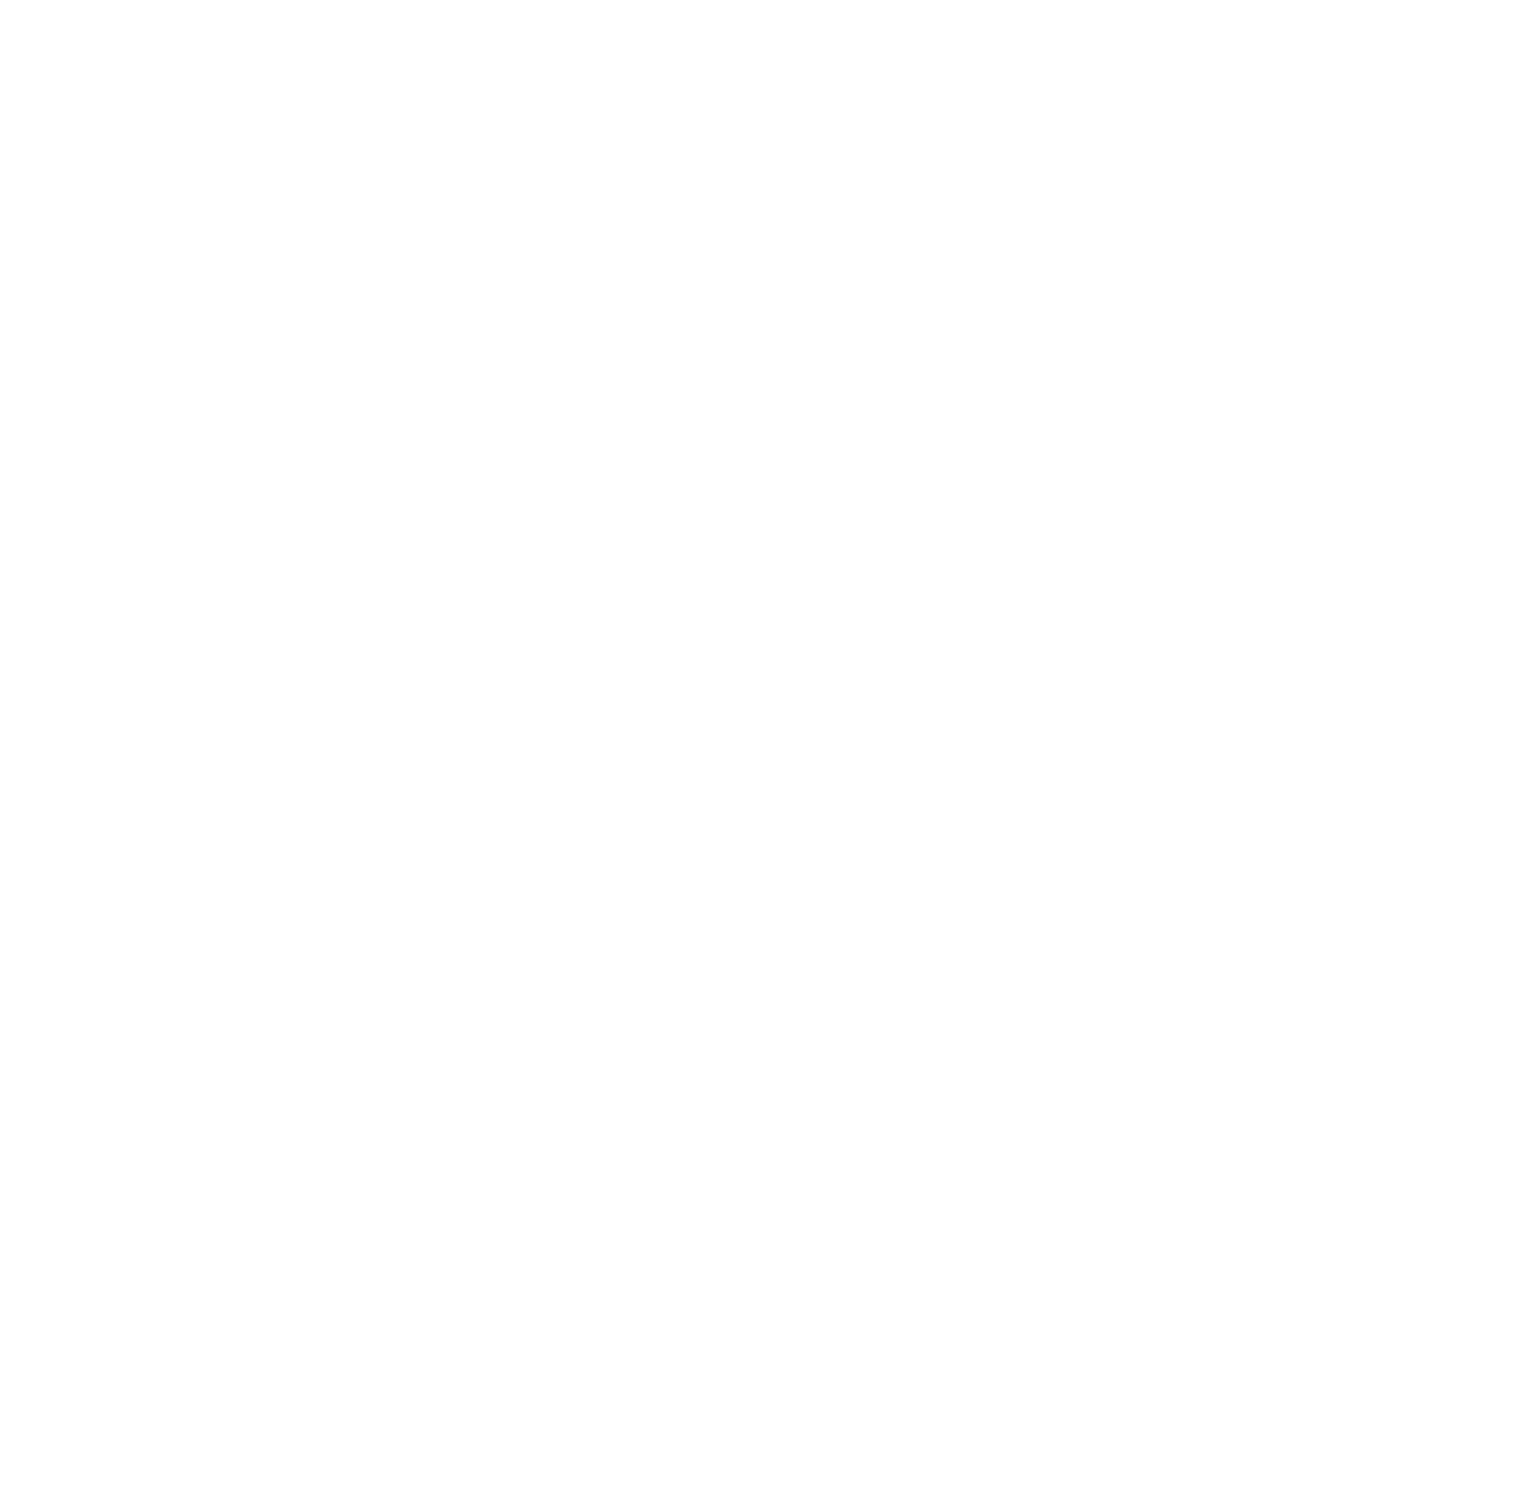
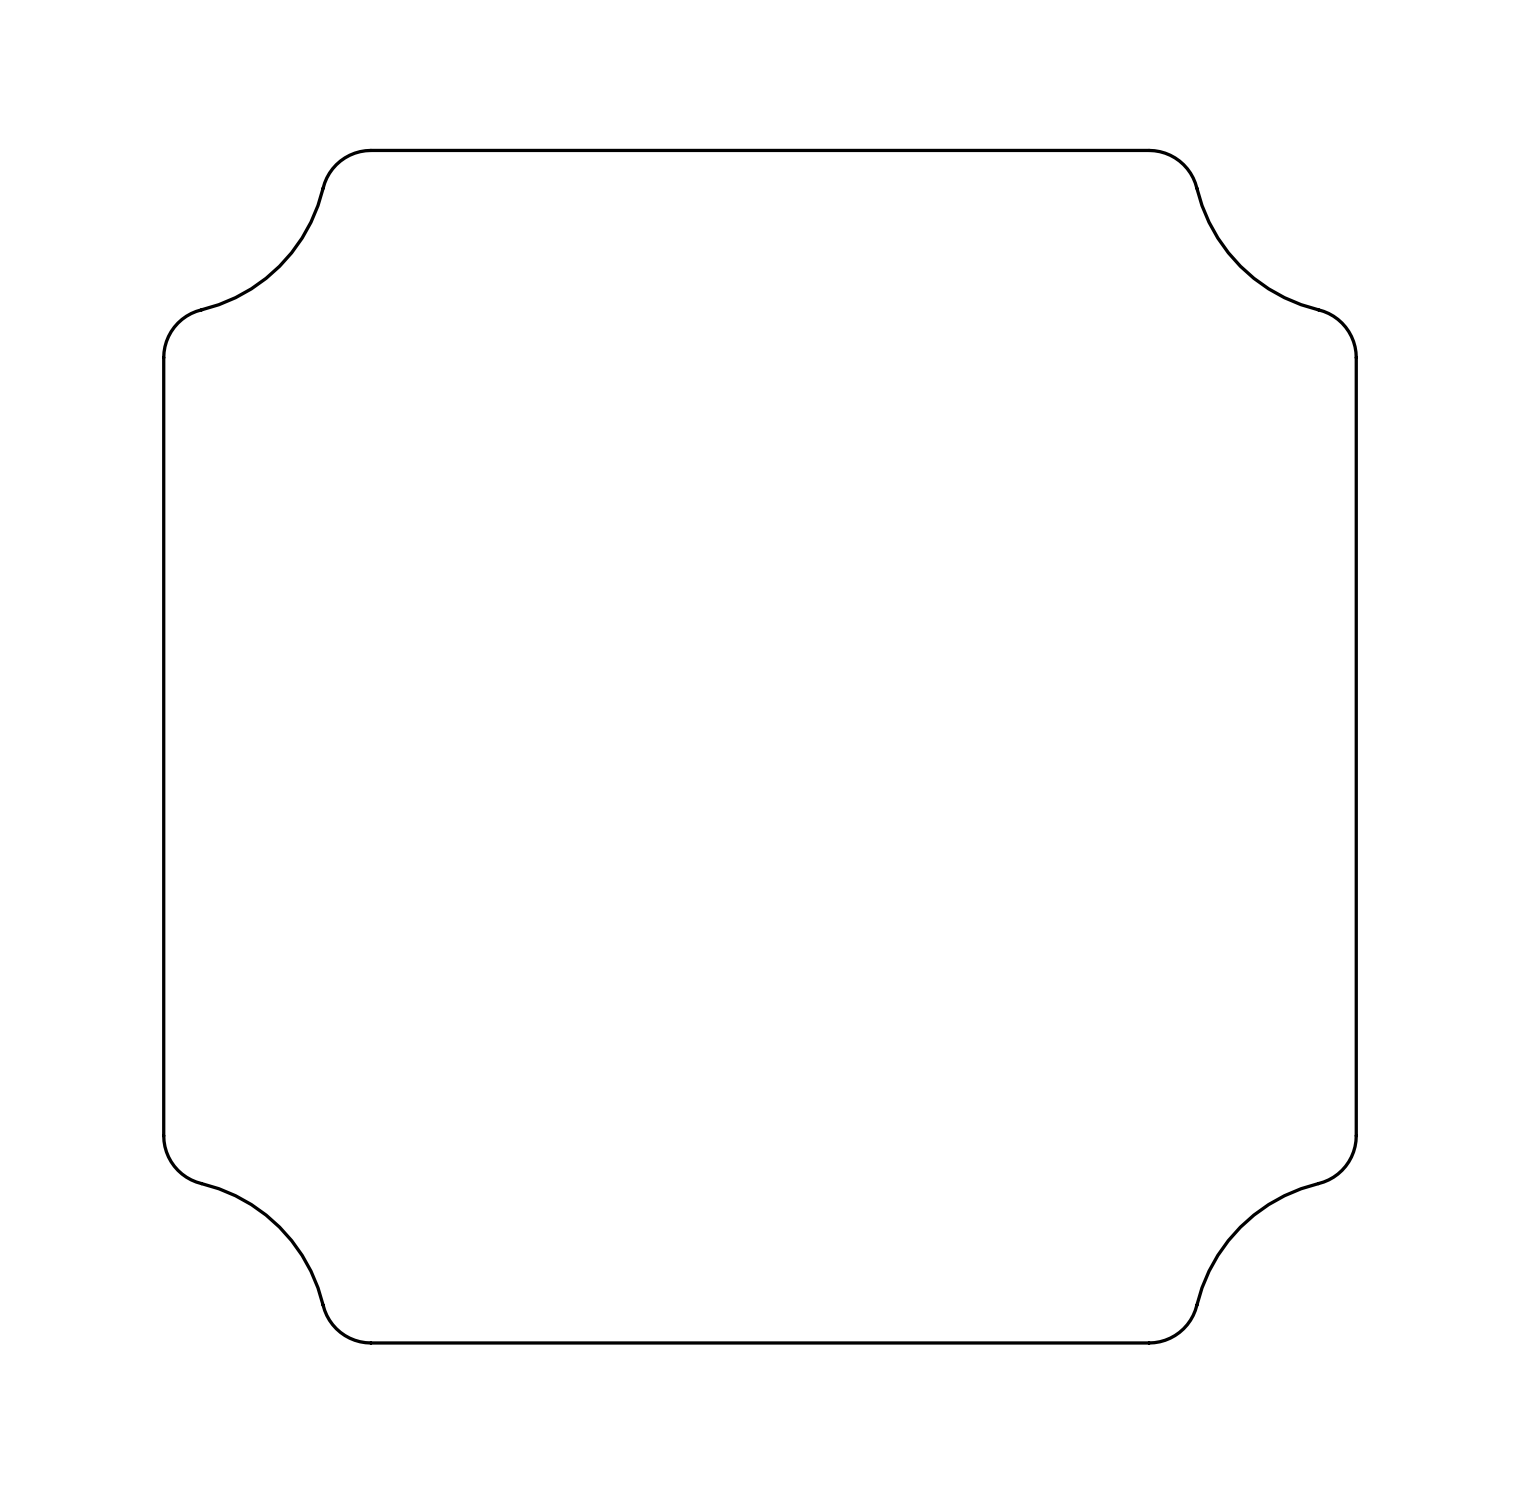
board edge: none -> (370, 150) (1159, 151) (1179, 161) (1190, 173) (1209, 222) (1217, 238) (1240, 266) (1268, 288) (1284, 297) (1333, 316) (1348, 331) (1355, 346) (1356, 357) (1355, 1146) (1345, 1166) (1333, 1177) (1284, 1195) (1268, 1204) (1240, 1227) (1228, 1240) (1209, 1271) (1190, 1320) (1175, 1335) (1159, 1341) (1149, 1342) (360, 1341) (344, 1335) (329, 1320) (310, 1271) (291, 1240) (279, 1227) (251, 1204) (235, 1195) (186, 1177) (171, 1161) (164, 1146) (163, 1135) (164, 346) (171, 331) (186, 316) (235, 297) (251, 288) (279, 266) (302, 238) (310, 222) (324, 183) (332, 168) (349, 155) (370, 150)

